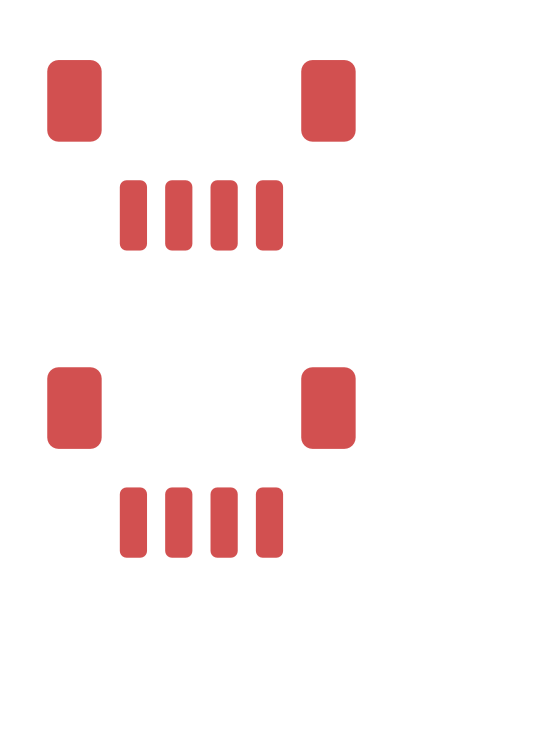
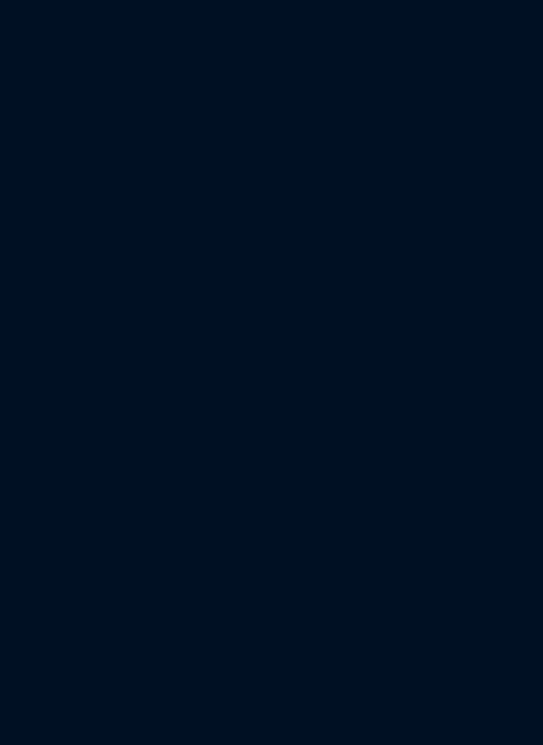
part: (201, 155) -> none
part: (201, 462) -> none

